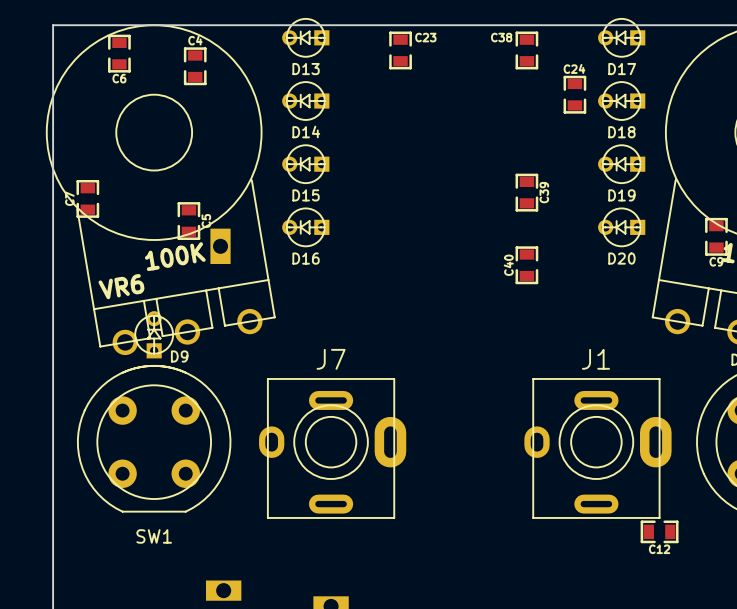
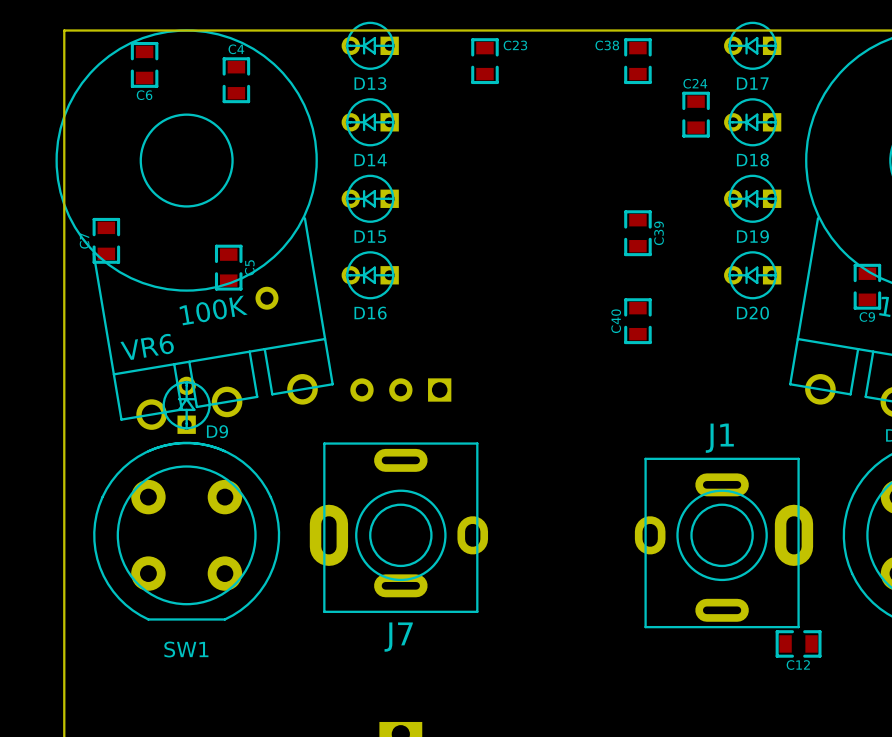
part footprint: [210, 228, 231, 265] -> [255, 286, 279, 310]
part: none -> (400, 390)
J7 rotation: 0° (332, 448) -> 180° (398, 527)
part: (223, 590) -> none

